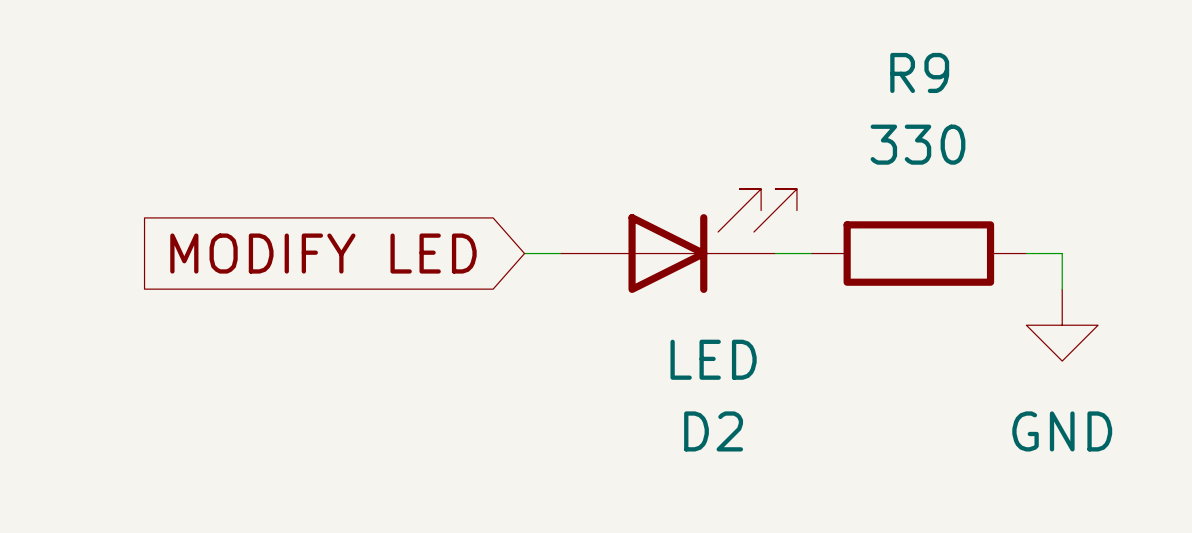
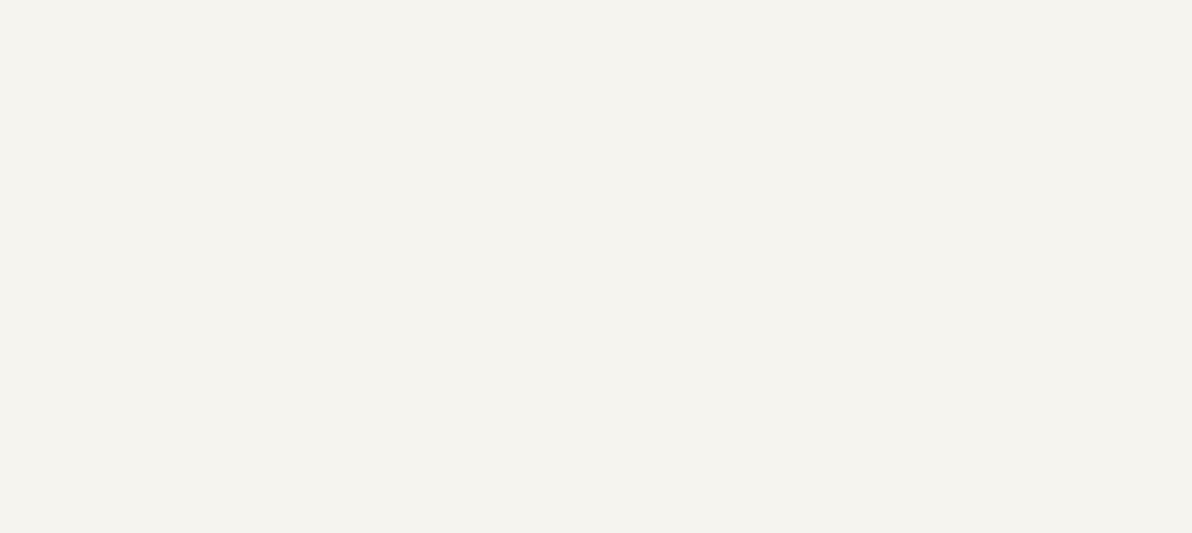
D2: LED (678, 240) -> none
global label: MODIFY LED (323, 253) -> none
wire: (524, 253) (560, 253) -> none
wire: (775, 253) (811, 253) -> none
R9: 330 (918, 253) -> none
wire: (1026, 253) (1062, 253) (1062, 289) -> none
power symbol: GND (1062, 325) -> none

